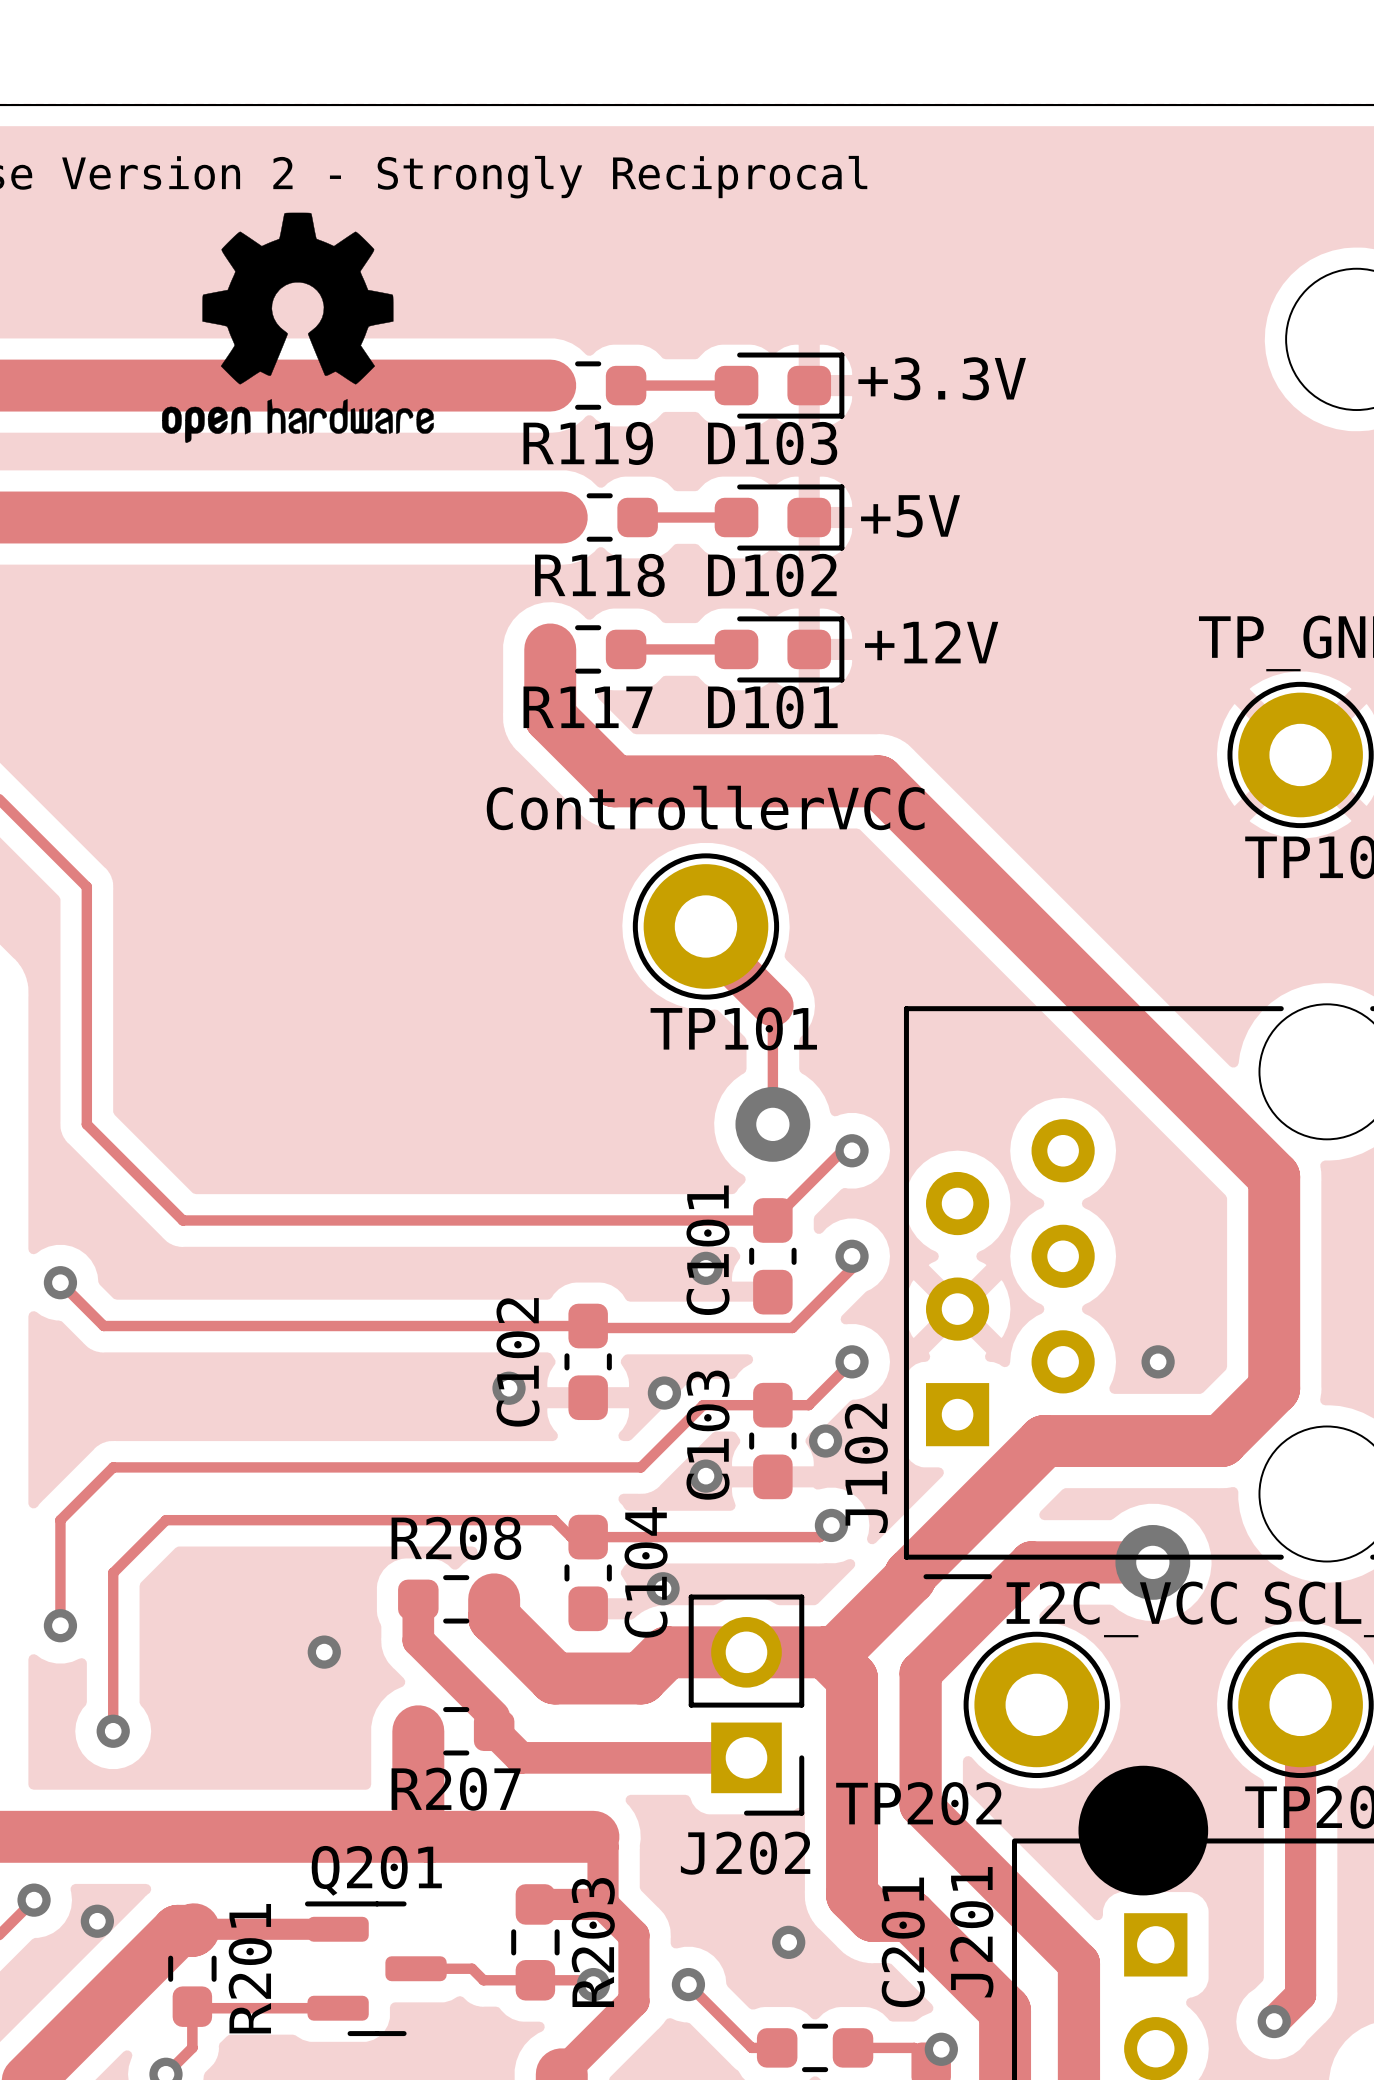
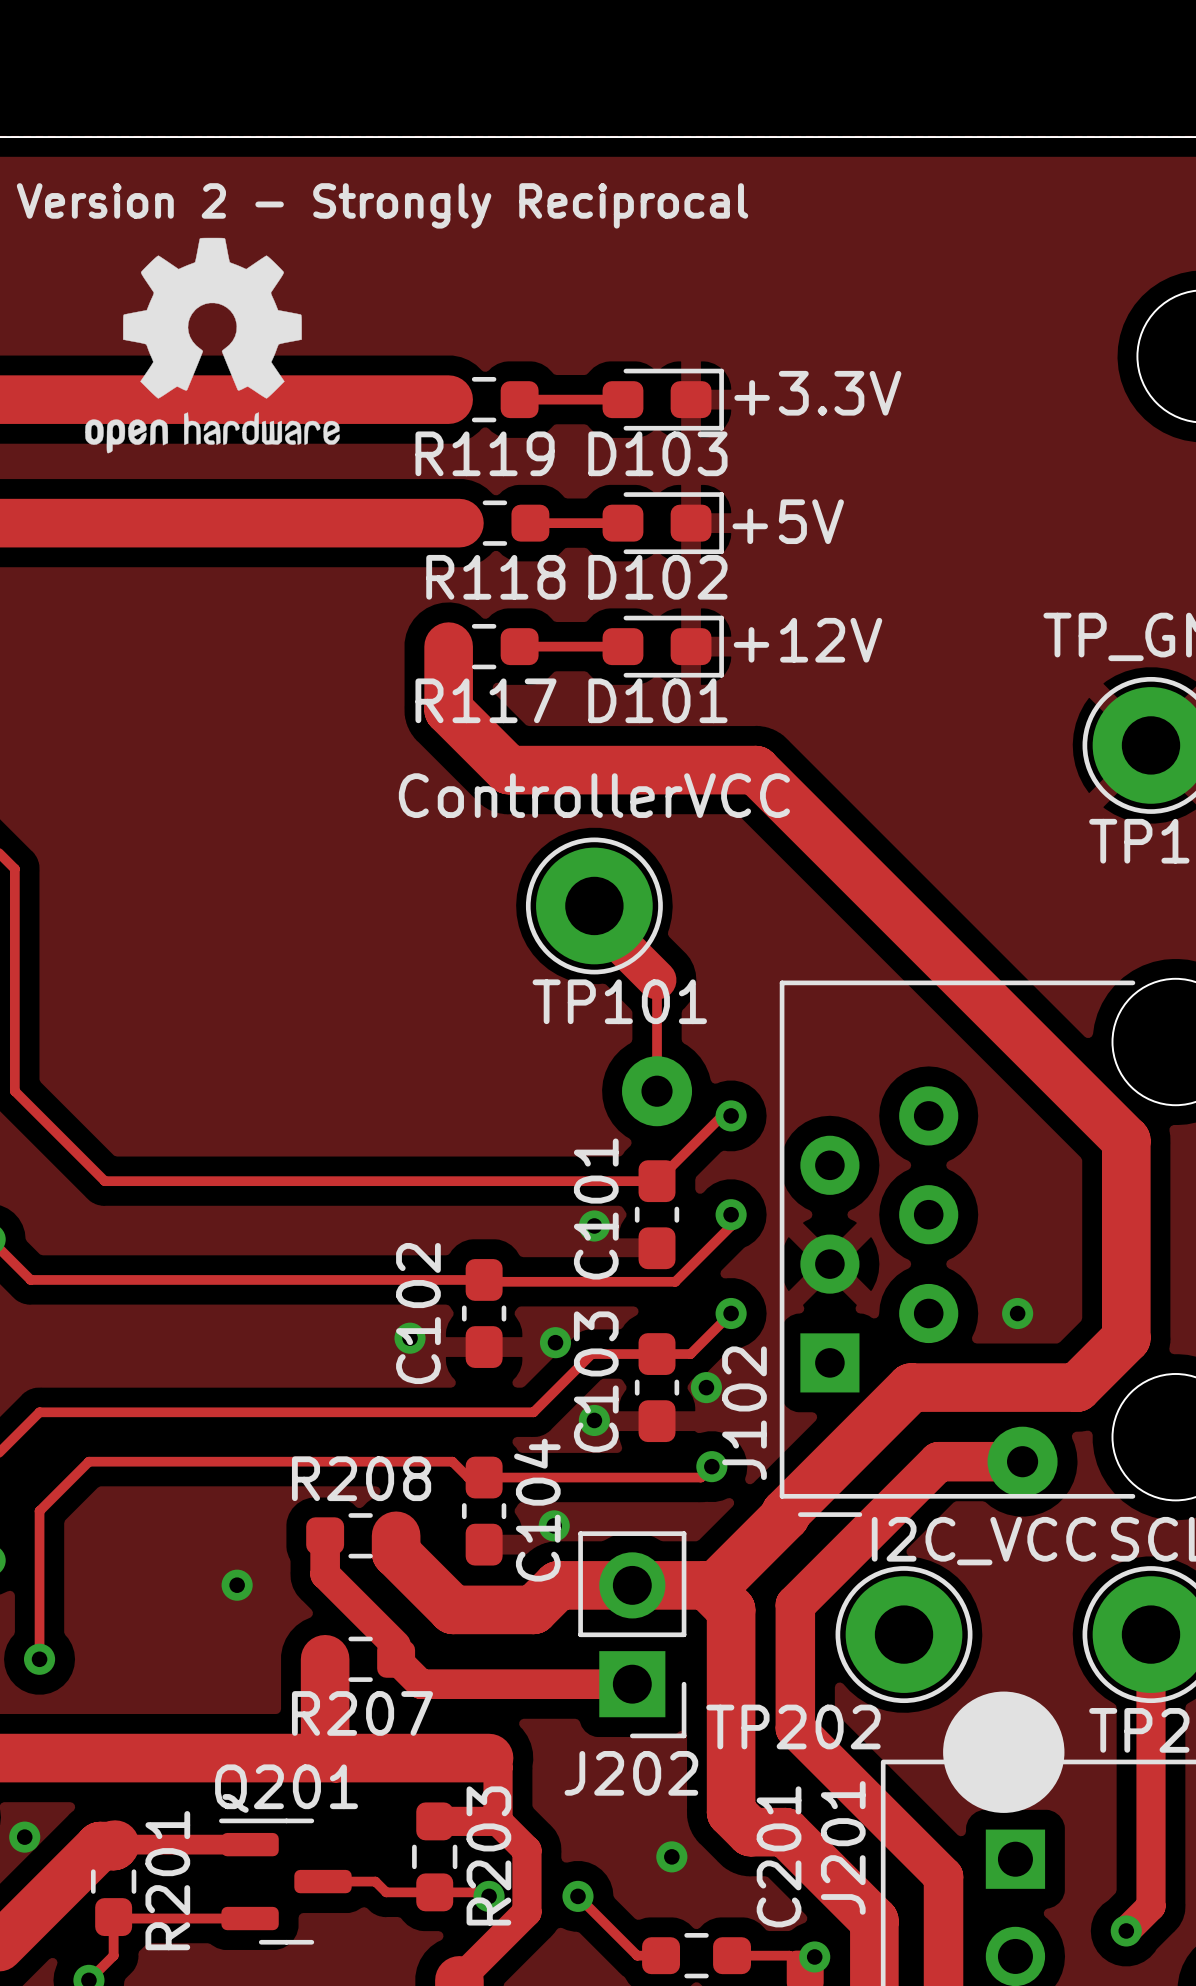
track: (1031, 1562) (1152, 1562) -> (898, 1501) (938, 1461) (1022, 1461)
via position: (1152, 1562) -> (1022, 1461)

